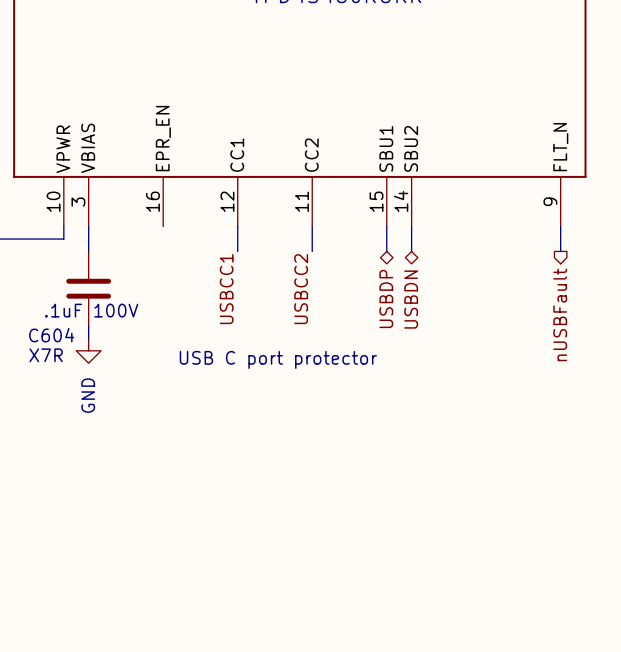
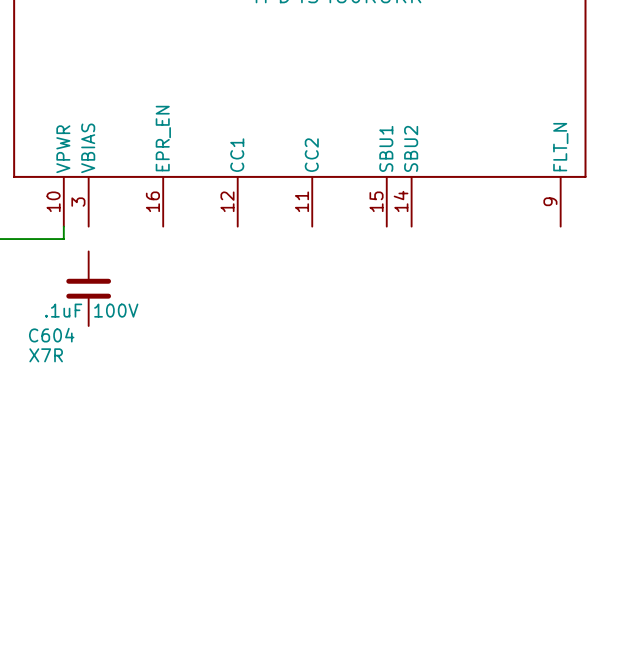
wire: (88, 226) (88, 251) -> none
wire: (237, 226) (237, 251) -> none
wire: (312, 226) (312, 251) -> none
wire: (386, 226) (386, 251) -> none
wire: (411, 226) (411, 251) -> none
wire: (560, 226) (560, 251) -> none
label: USBCC1 (226, 289) -> none
label: USBCC2 (301, 289) -> none
hierarchical label: USBDP (386, 298) -> none
hierarchical label: USBDN (411, 299) -> none
hierarchical label: nUSBFault (560, 314) -> none
wire: (88, 325) (88, 338) -> none
power symbol: GND (88, 350) -> none
text: USB C port protector (278, 359) -> none

